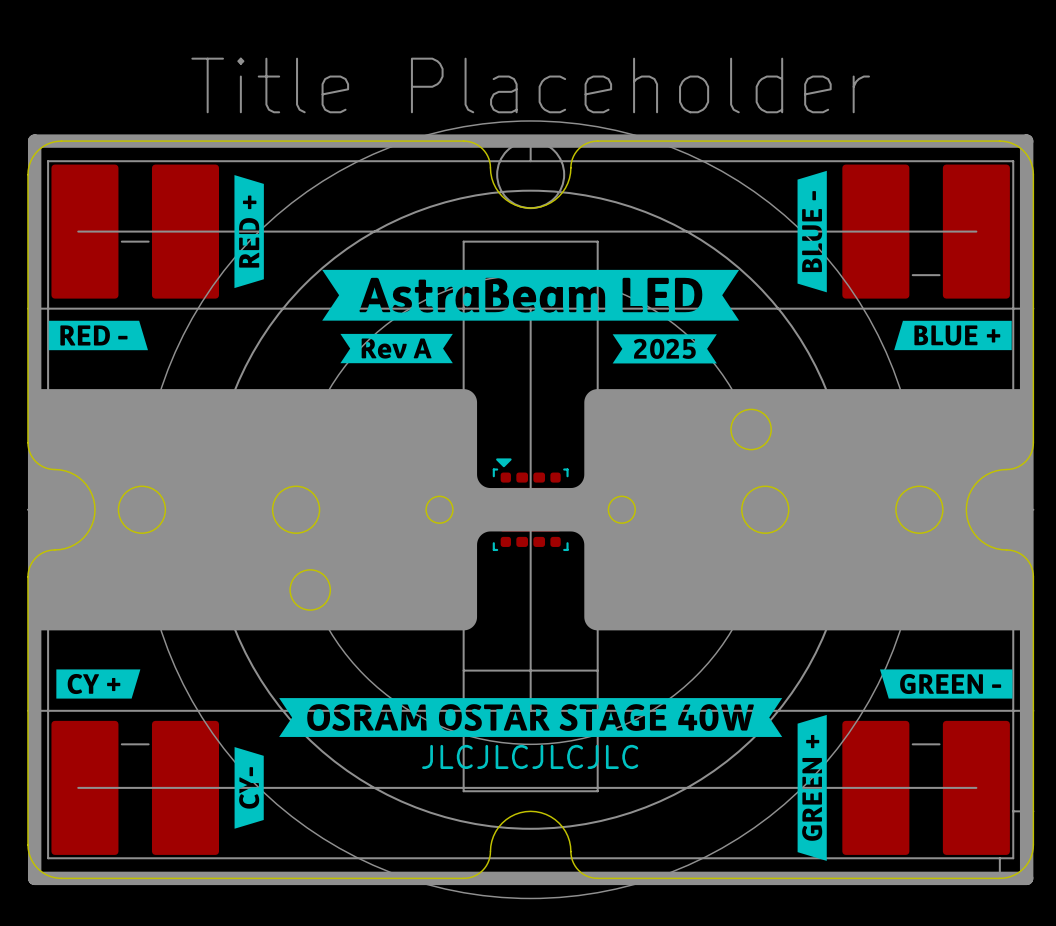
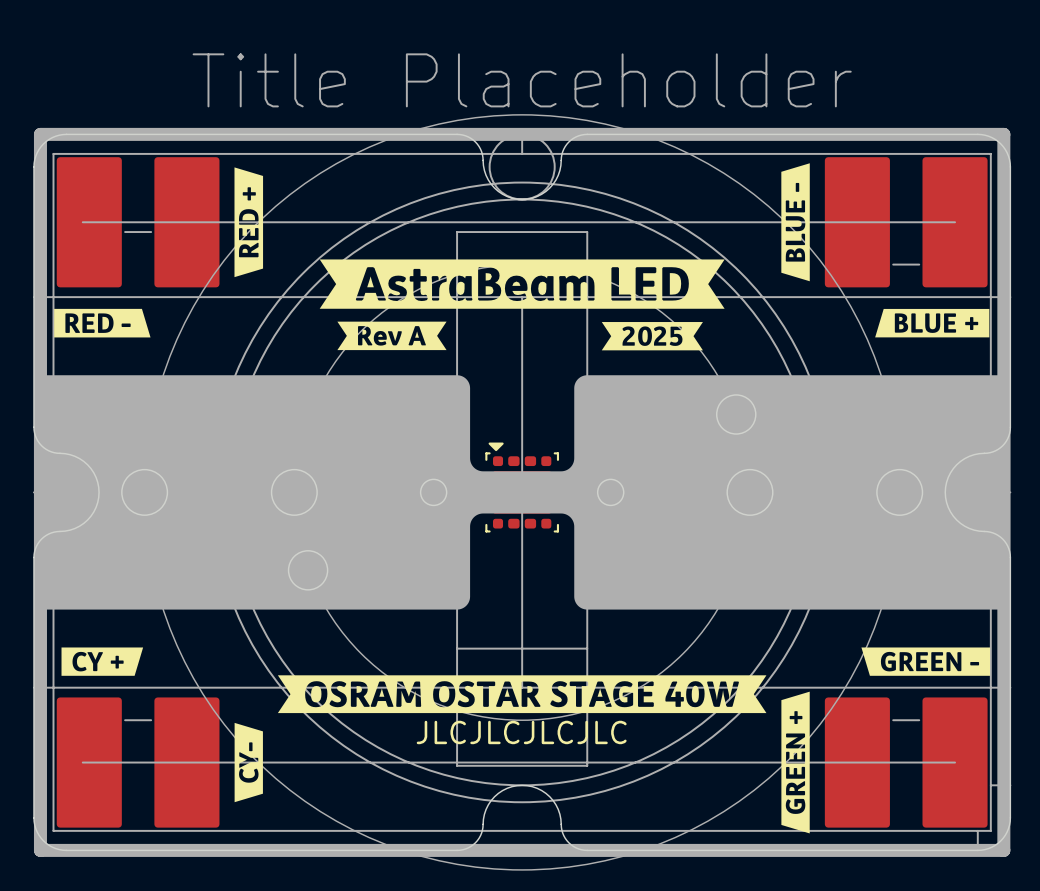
drawing: none -> [228, 198, 817, 787]

